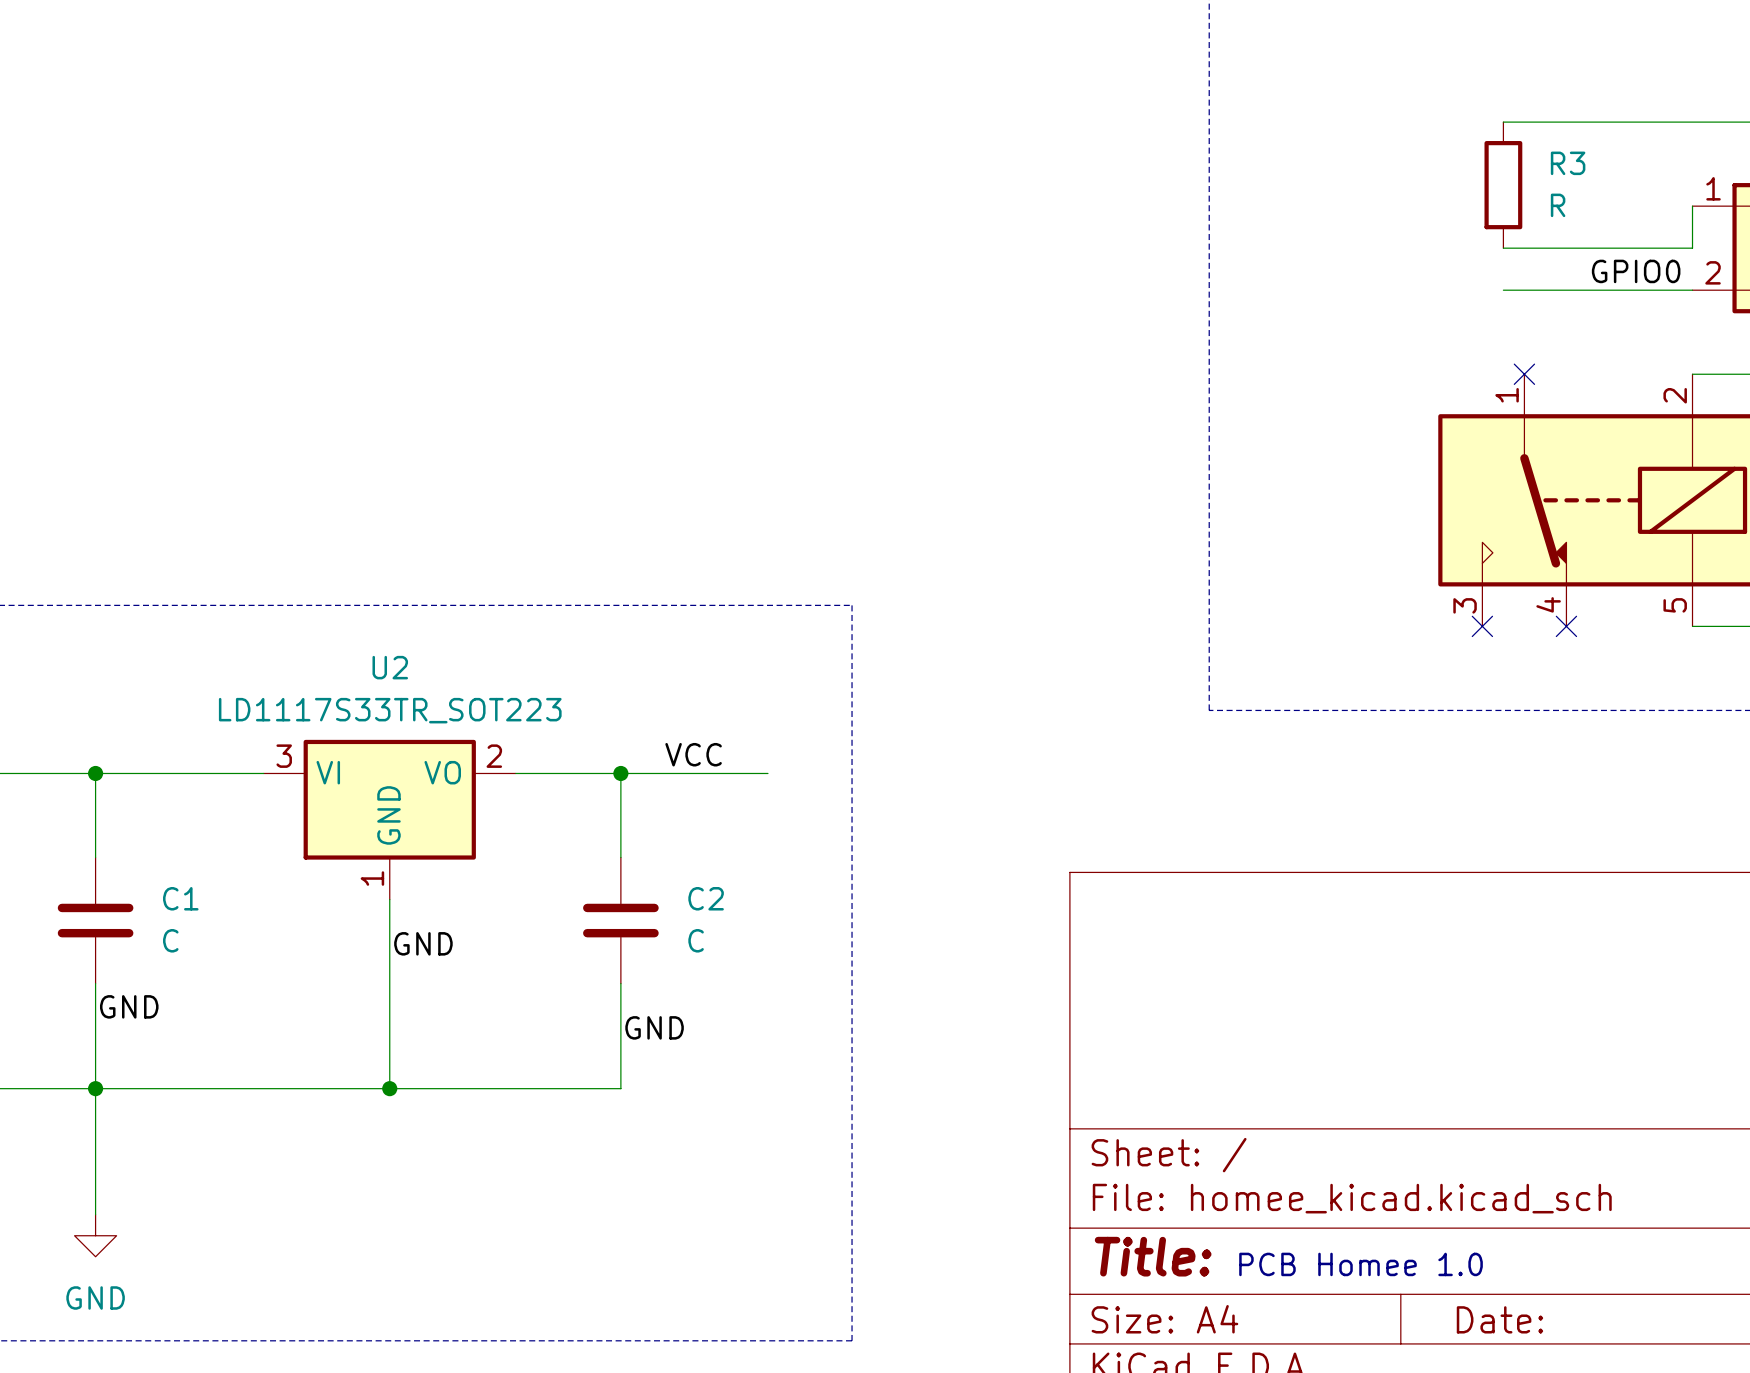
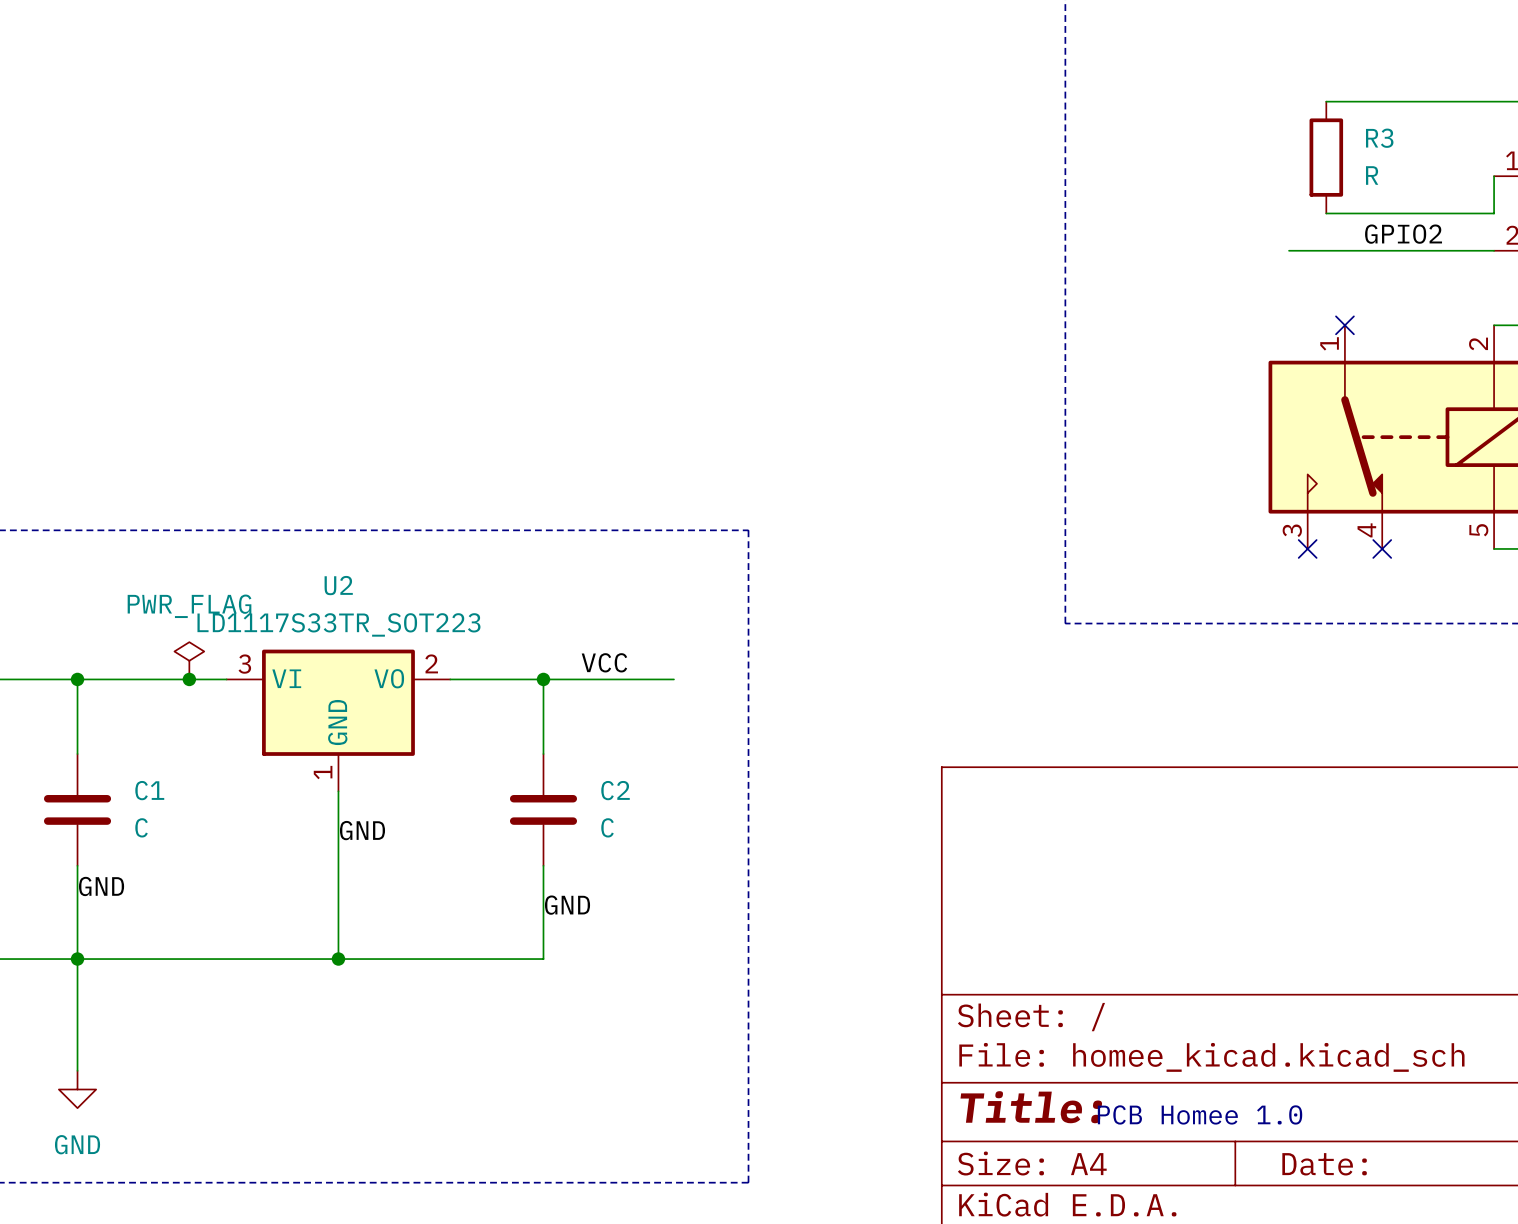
label: GPIO0 (1636, 271) -> GPIO2 (1403, 234)
wire: none -> (1289, 250) (1326, 250)
power symbol: none -> PWR_FLAG (189, 660)
junction: none -> (189, 679)

